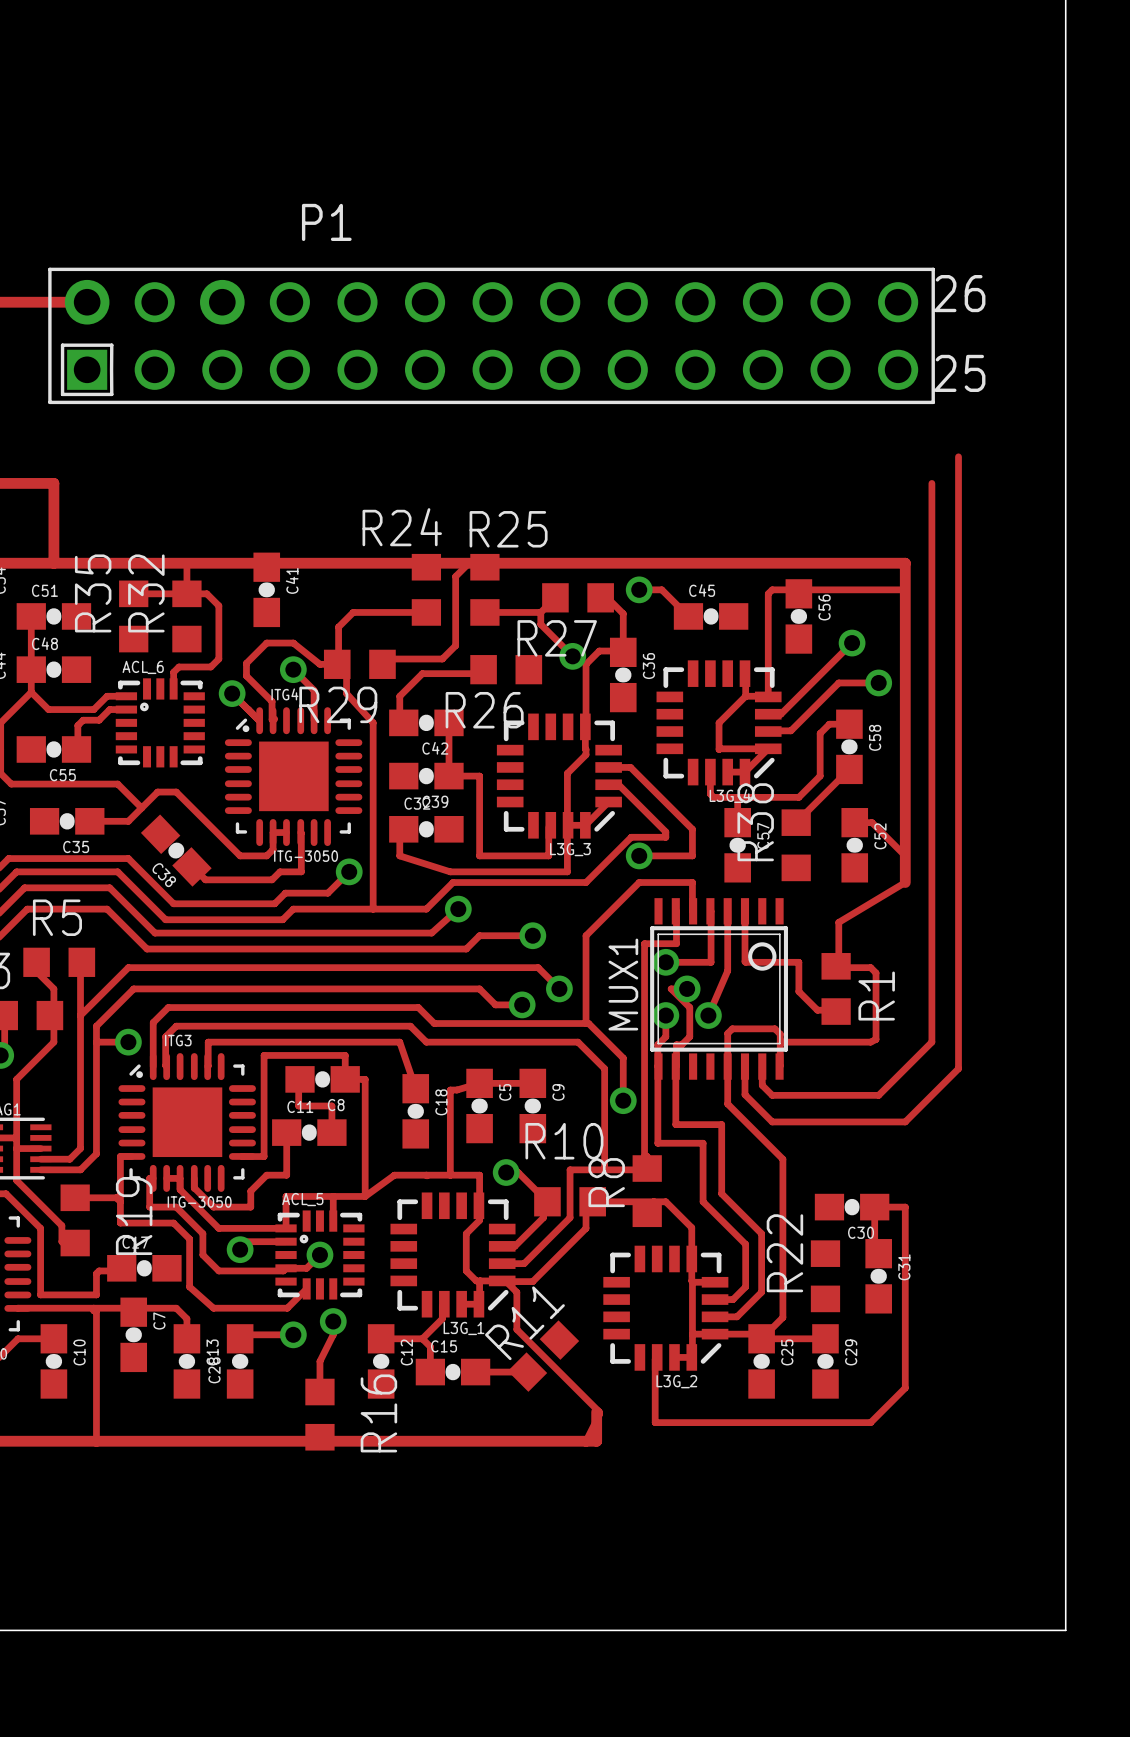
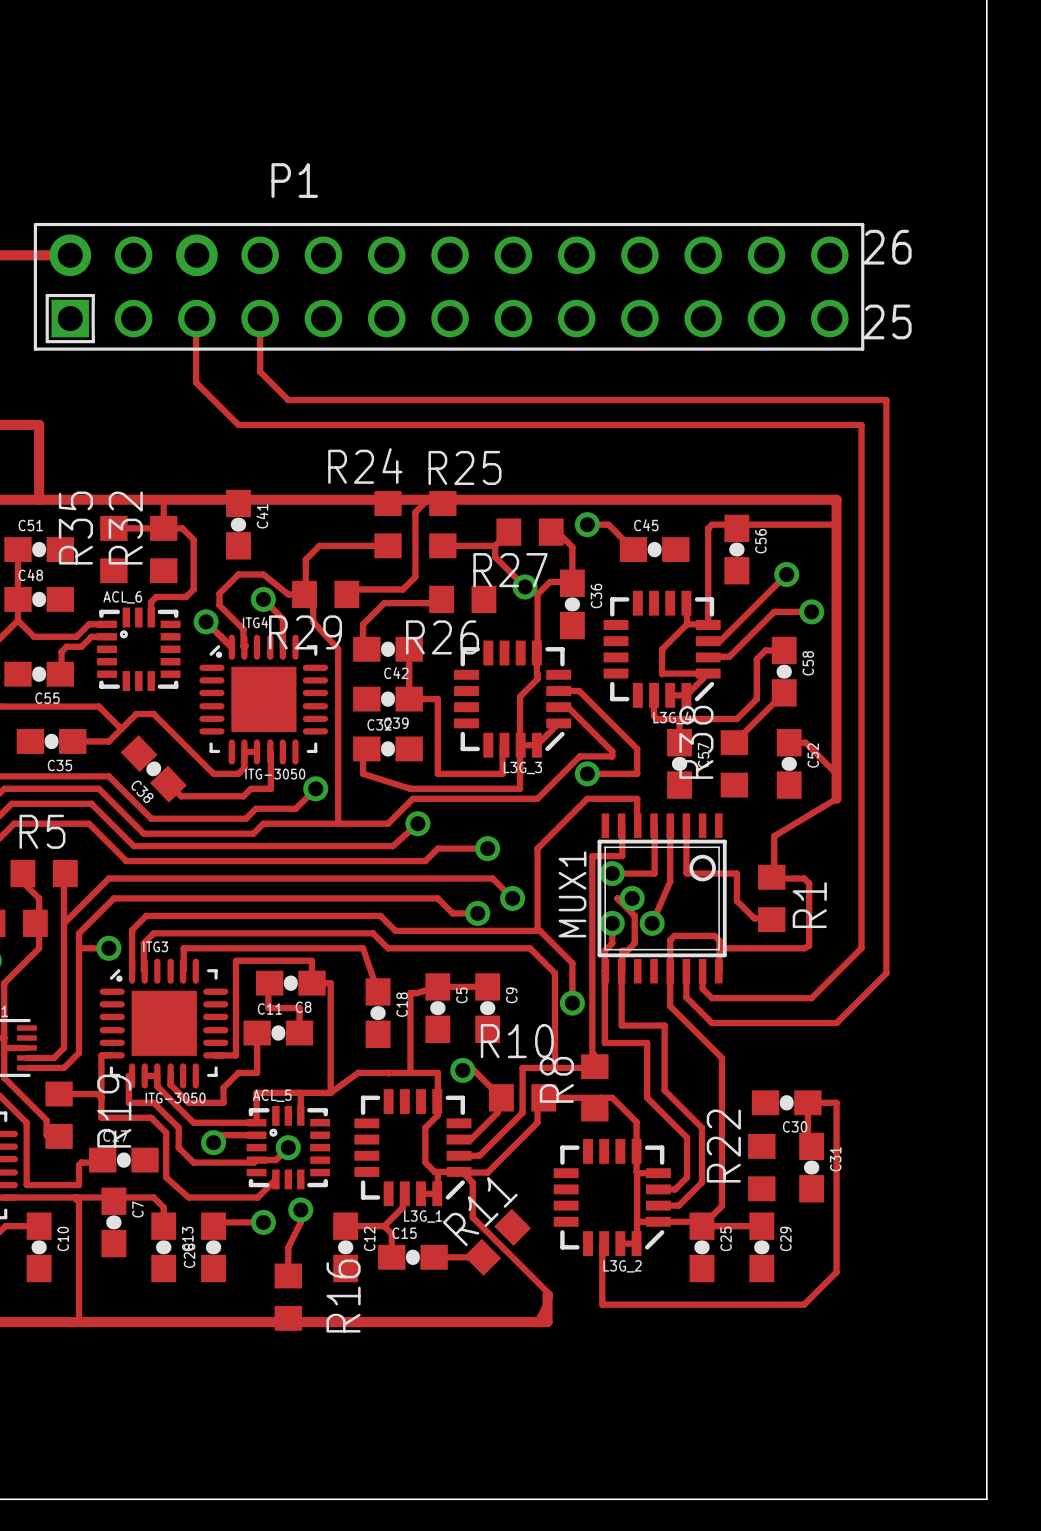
track: none -> (196, 318) (196, 382) (238, 424) (861, 424)
track: none -> (260, 318) (260, 371) (288, 400) (886, 400)

